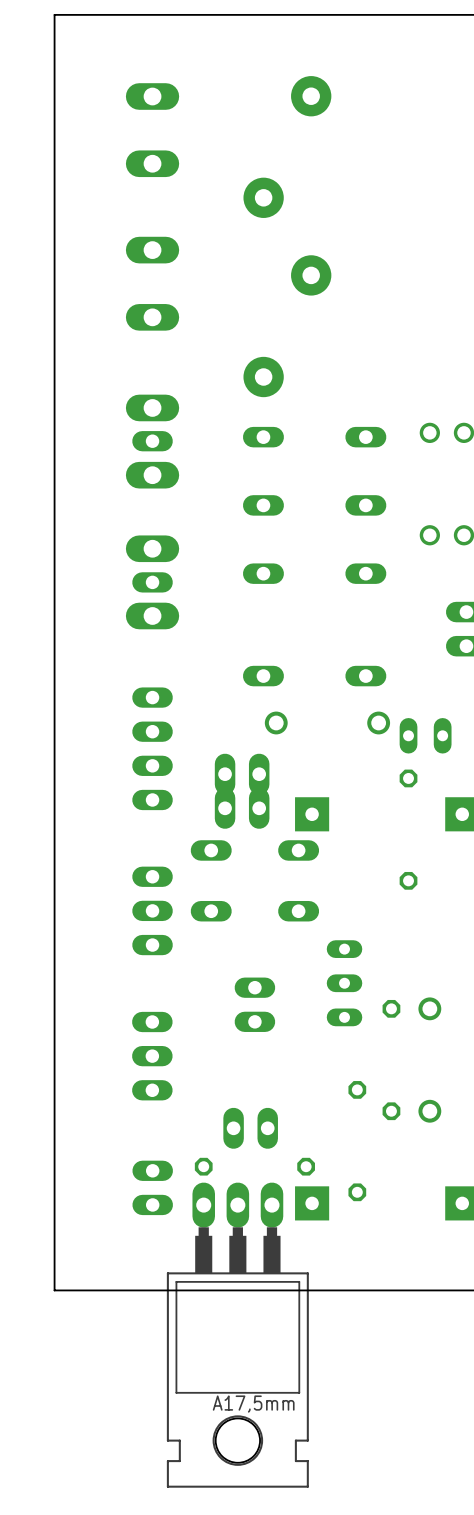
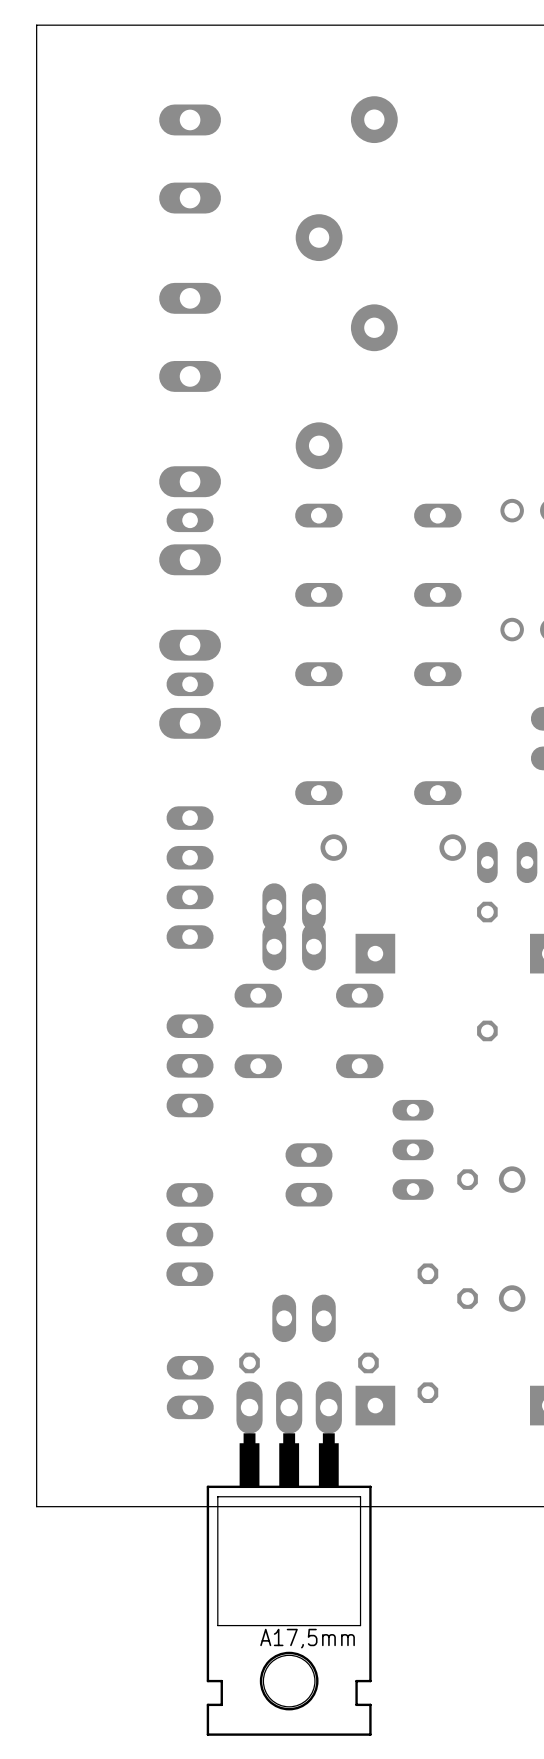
board edge: (54, 14) (54, 1290) -> (76, 25) (36, 25) (36, 1506) (76, 1506)

